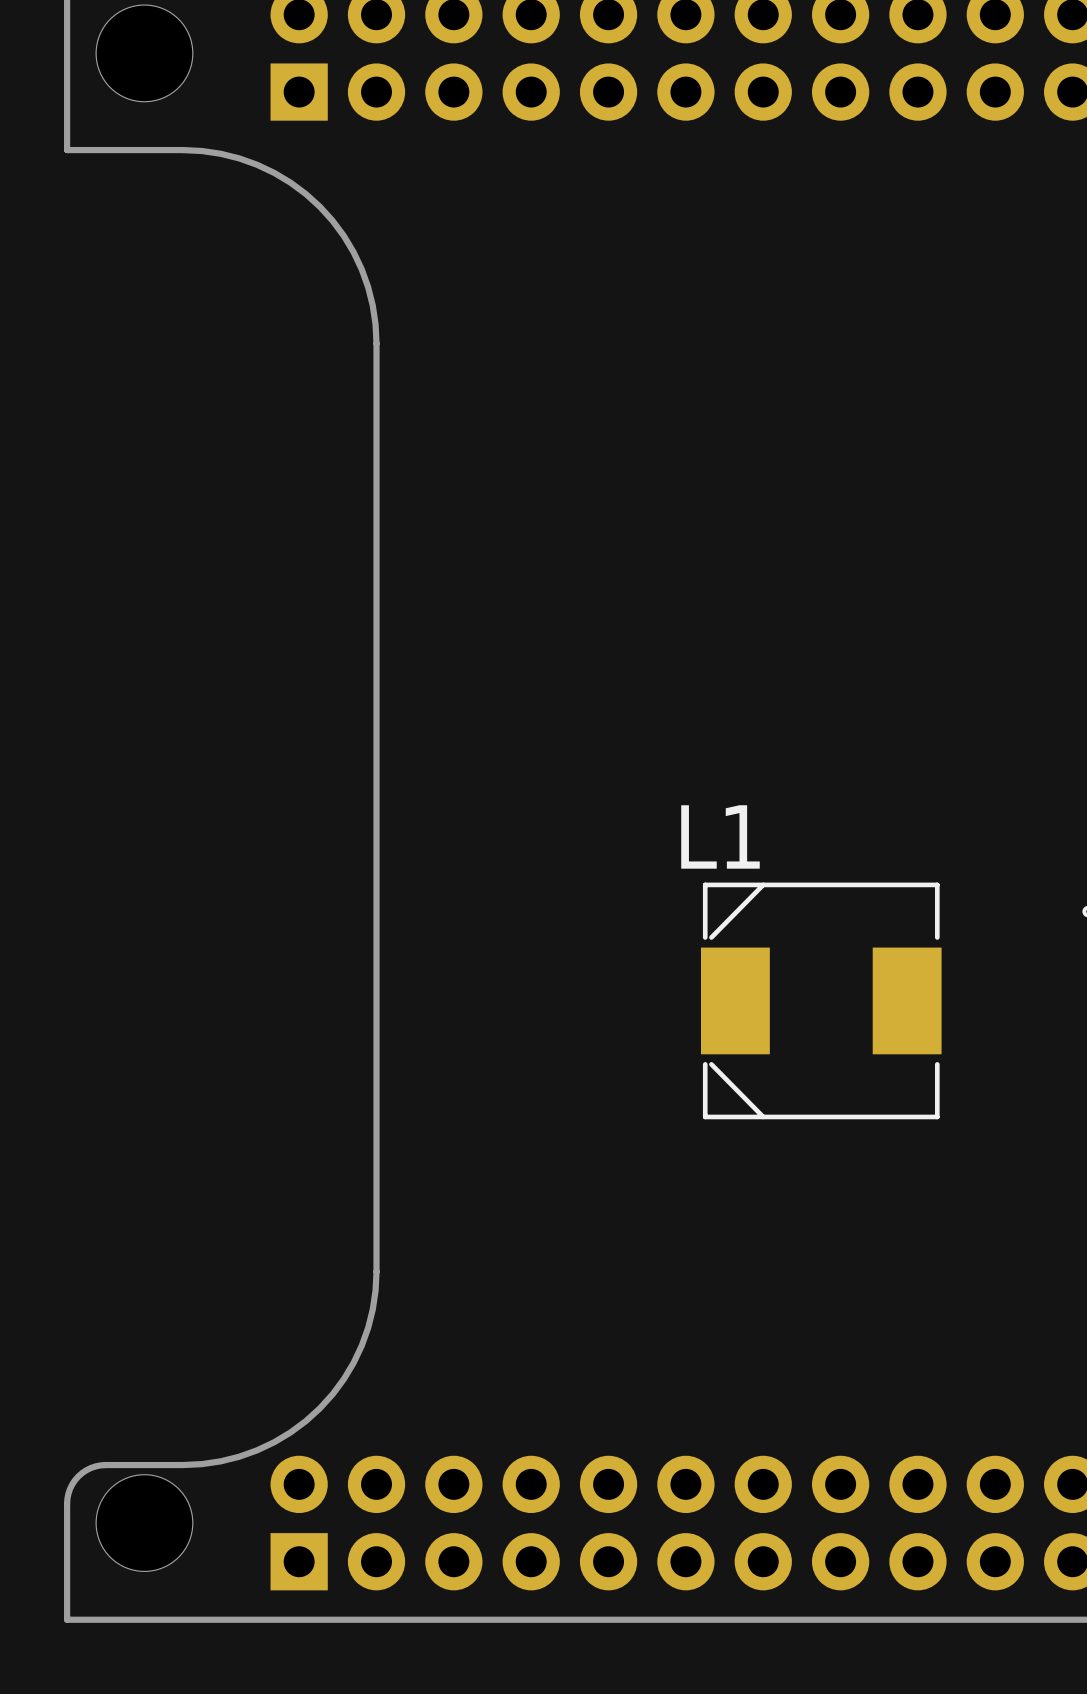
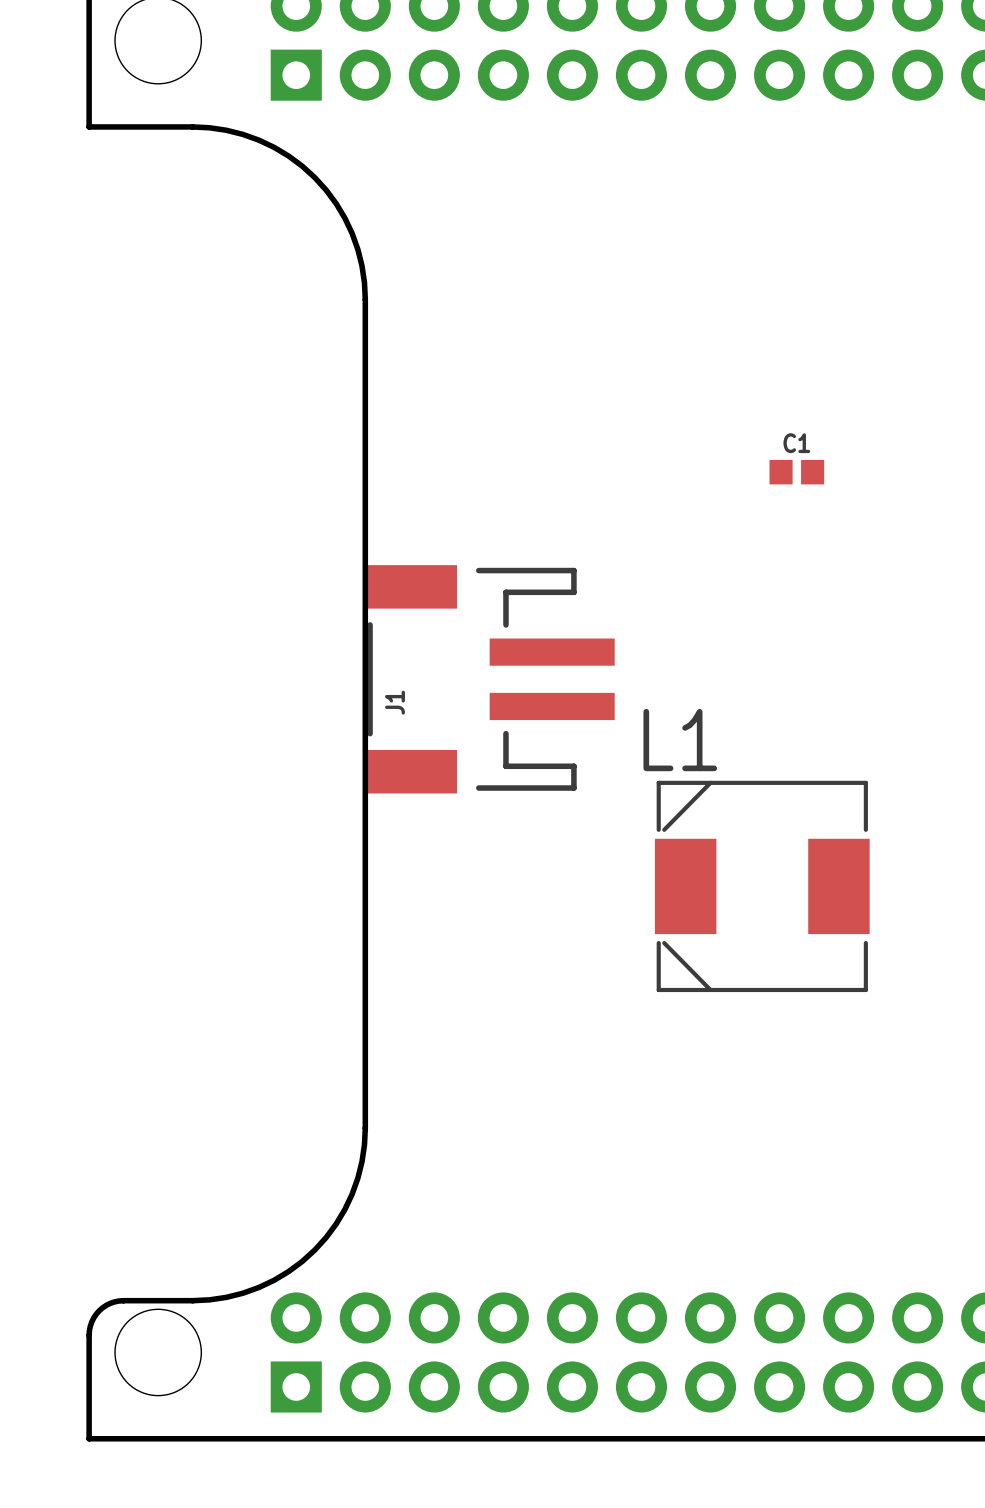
C1: none -> (796, 472)
J1: none -> (489, 679)

